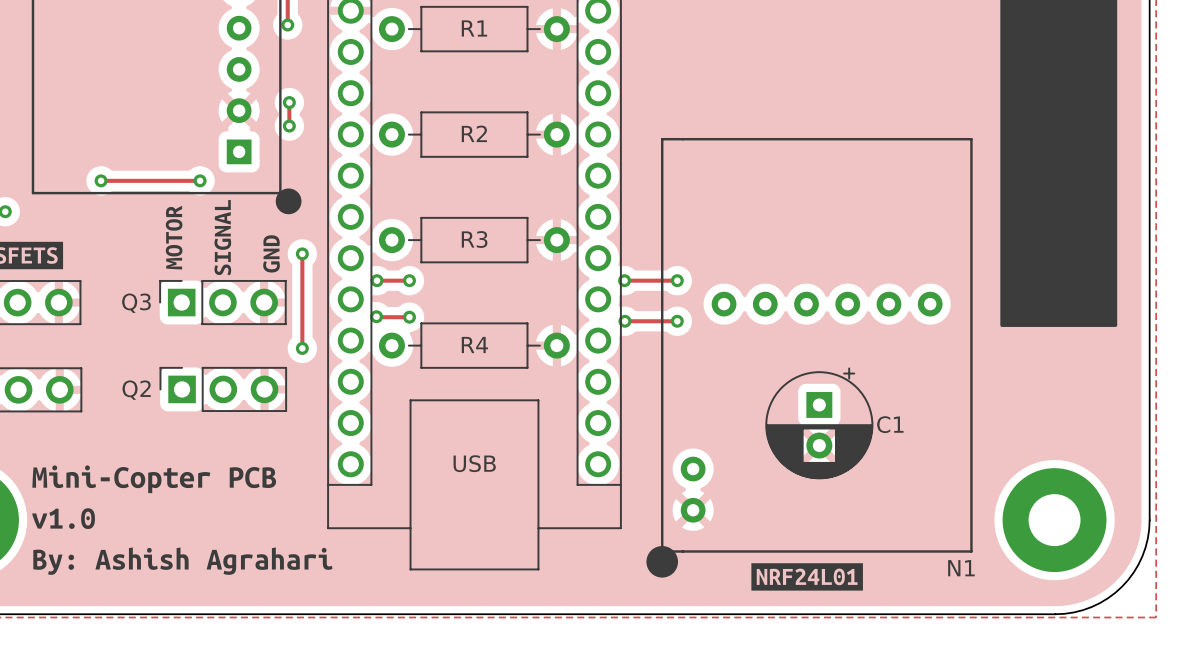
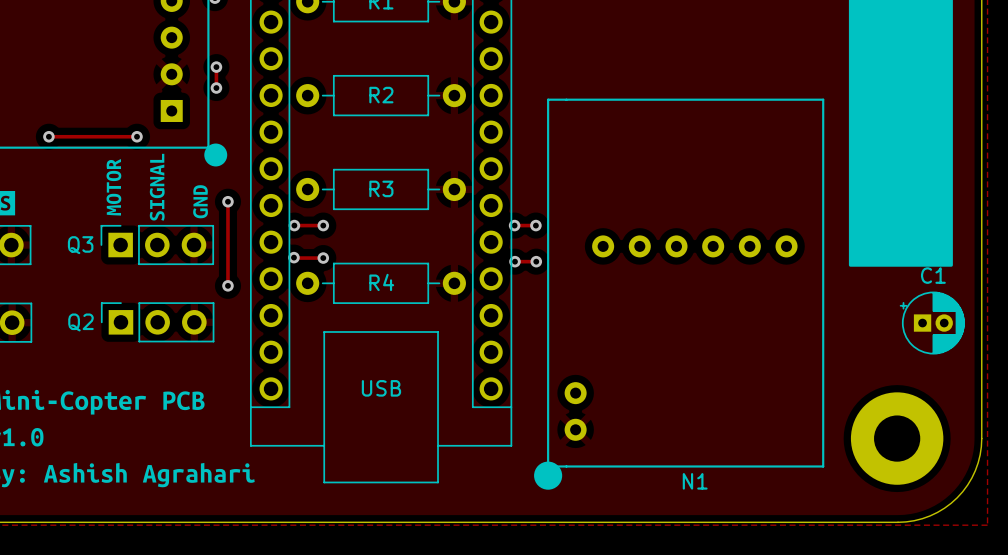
track: (648, 280) (677, 280) -> none
via: none -> (535, 225)
via: (677, 280) -> none
track: (648, 321) (677, 321) -> none
via: none -> (536, 261)
via: (677, 321) -> none
C1 footprint: [765, 367, 874, 480] -> [899, 291, 965, 355]
C1 name position: C1 (890, 424) -> C1 (933, 275)
drawing: [751, 563, 863, 591] -> none
N1 name position: N1 (961, 568) -> N1 (695, 481)

